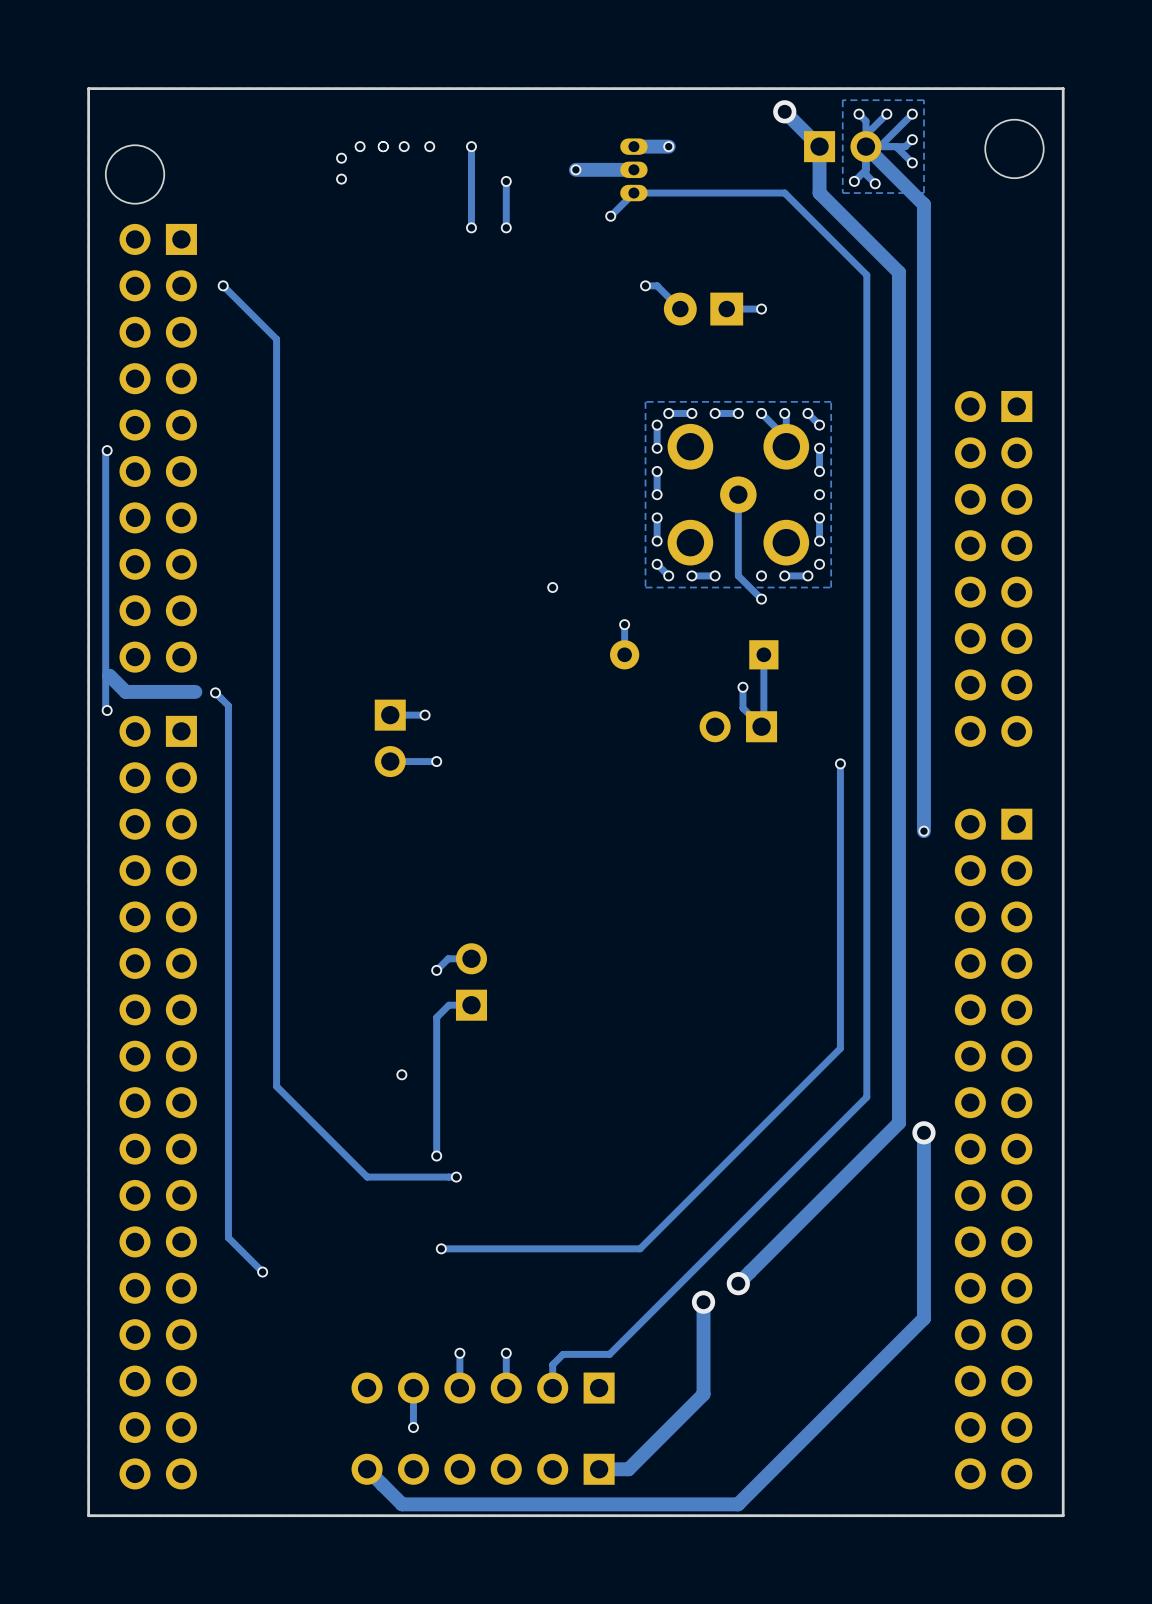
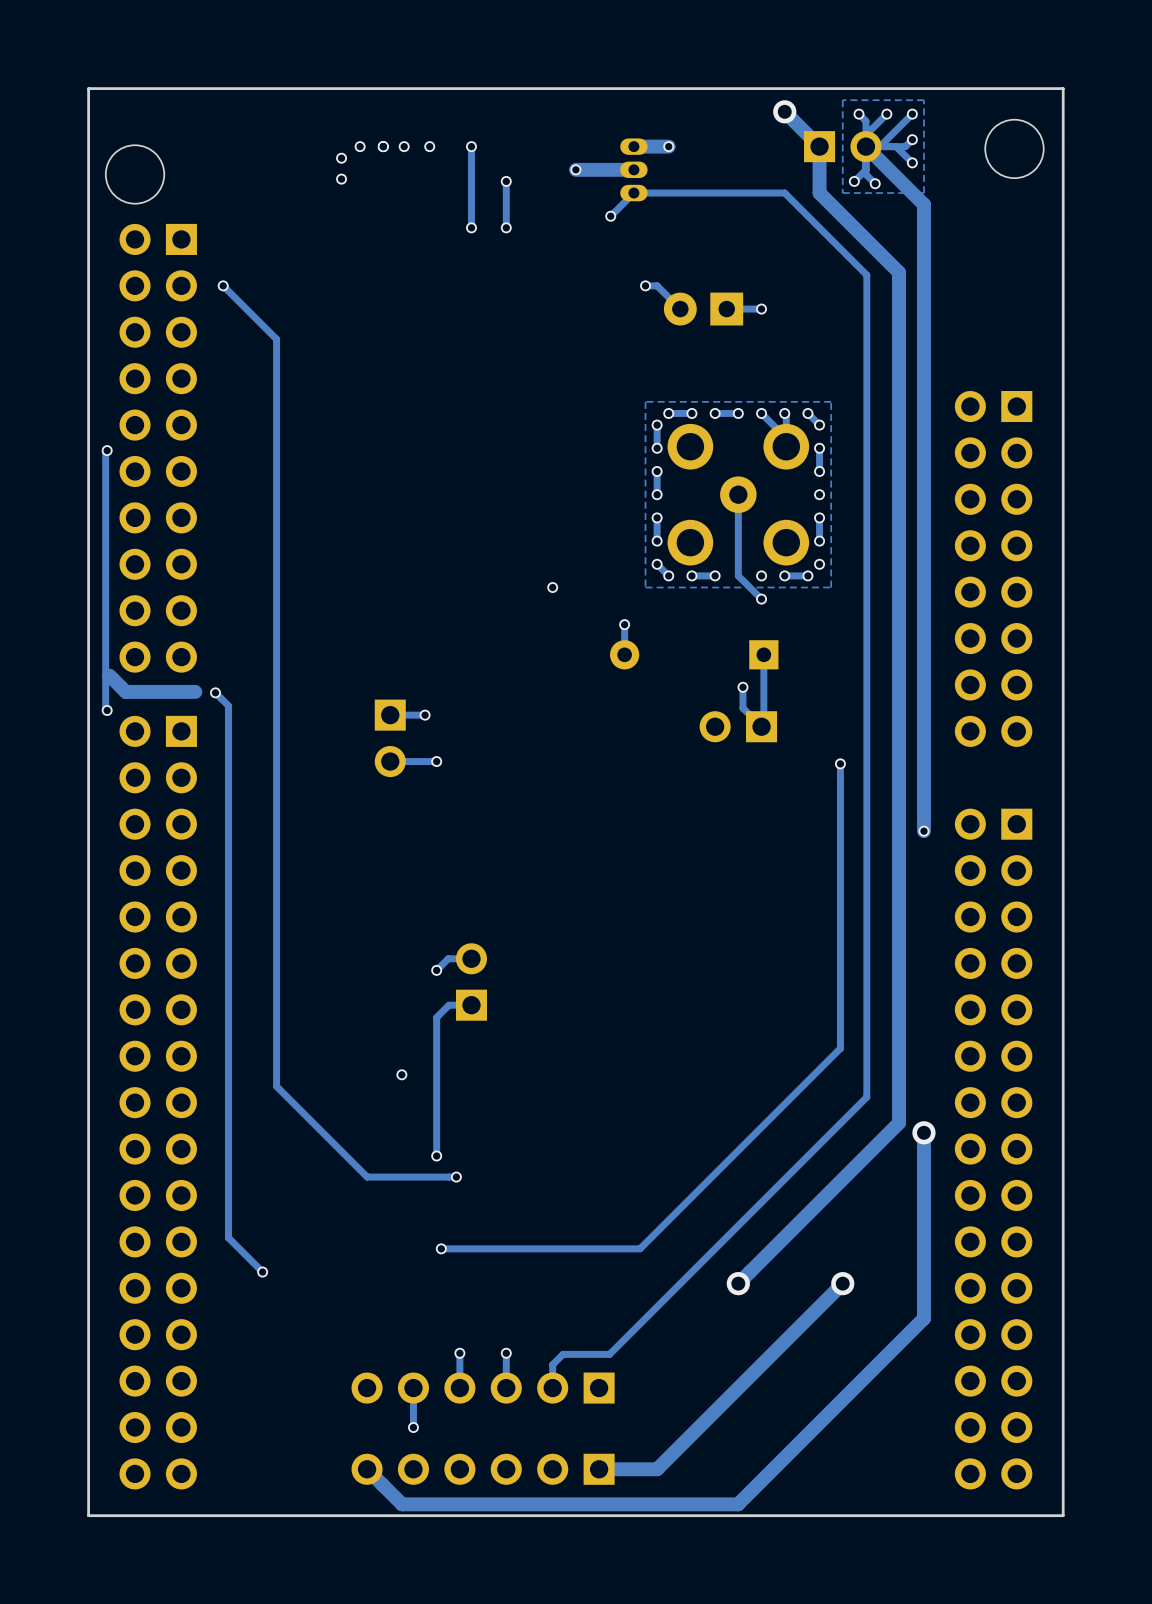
via: none -> (842, 1283)
track: (703, 1302) (703, 1394) (628, 1469) -> (842, 1283) (657, 1469) (628, 1469)
via: (703, 1302) -> none

